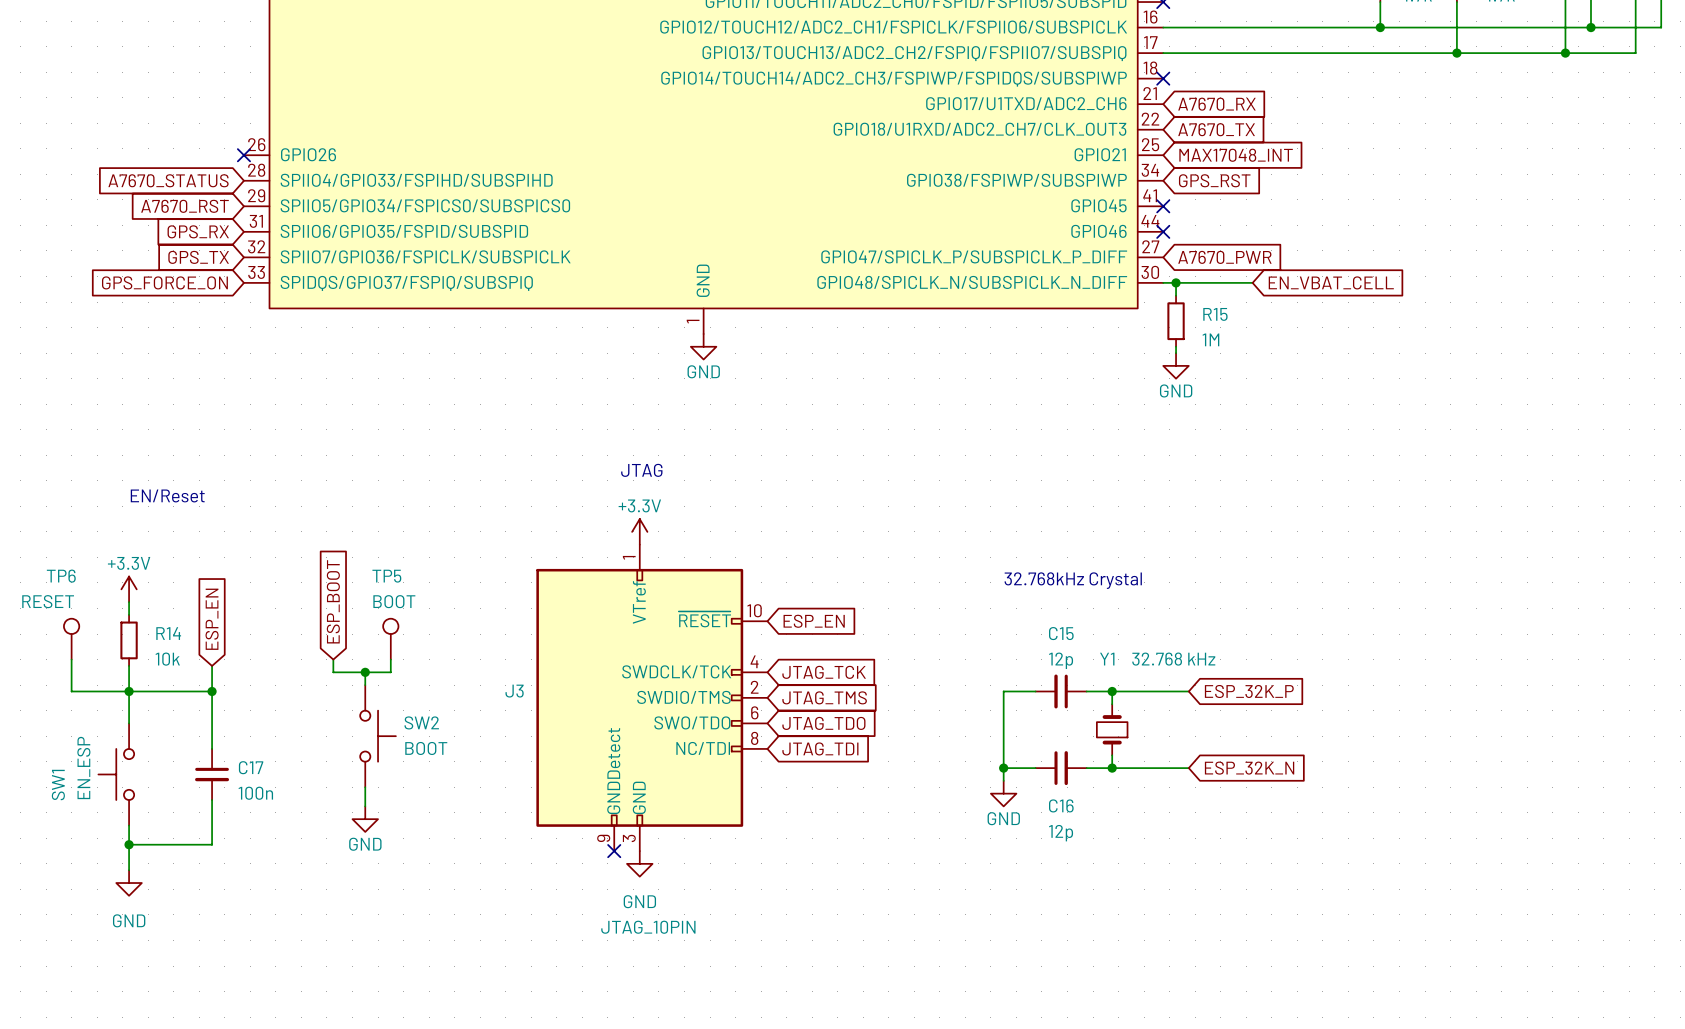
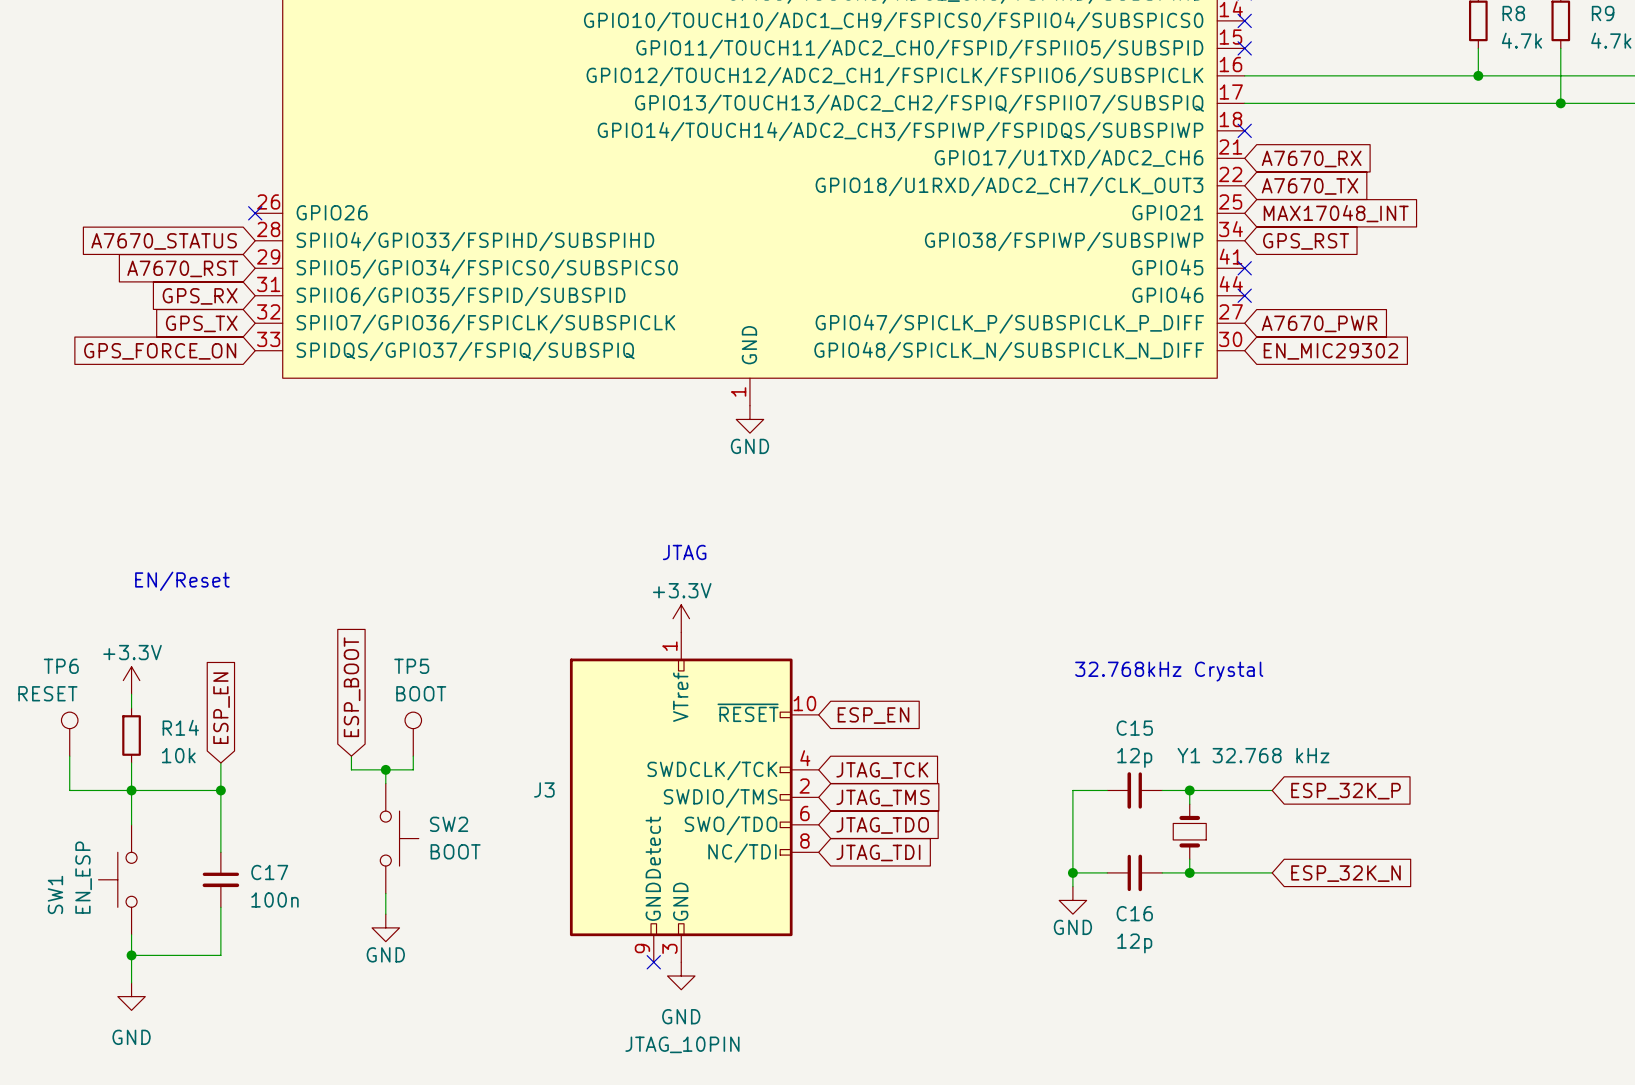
wire: (1163, 282) (1252, 282) -> none
wire: (1176, 282) (1176, 295) -> none
junction: (1176, 282) -> none
global label: none -> EN_MIC29302 (1330, 351)
global label: EN_VBAT_CELL (1331, 282) -> none
R15: 1M (1176, 321) -> none
wire: (1176, 346) (1176, 353) -> none
power symbol: GND (1176, 365) -> none

